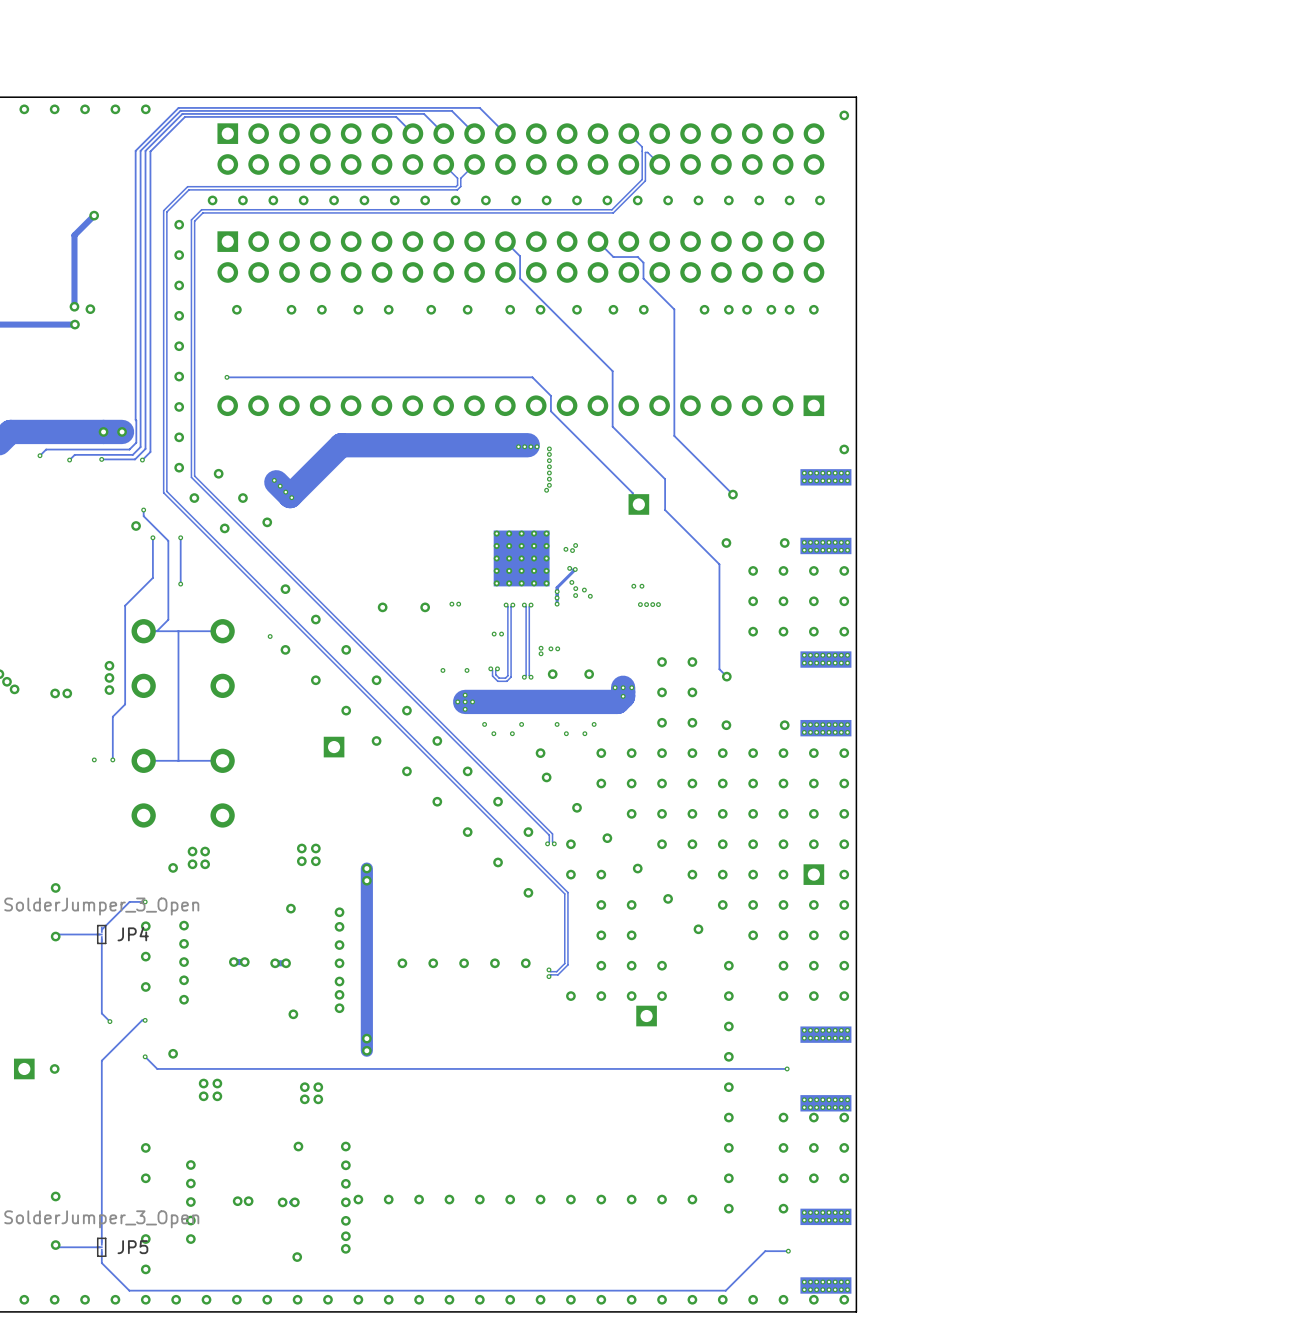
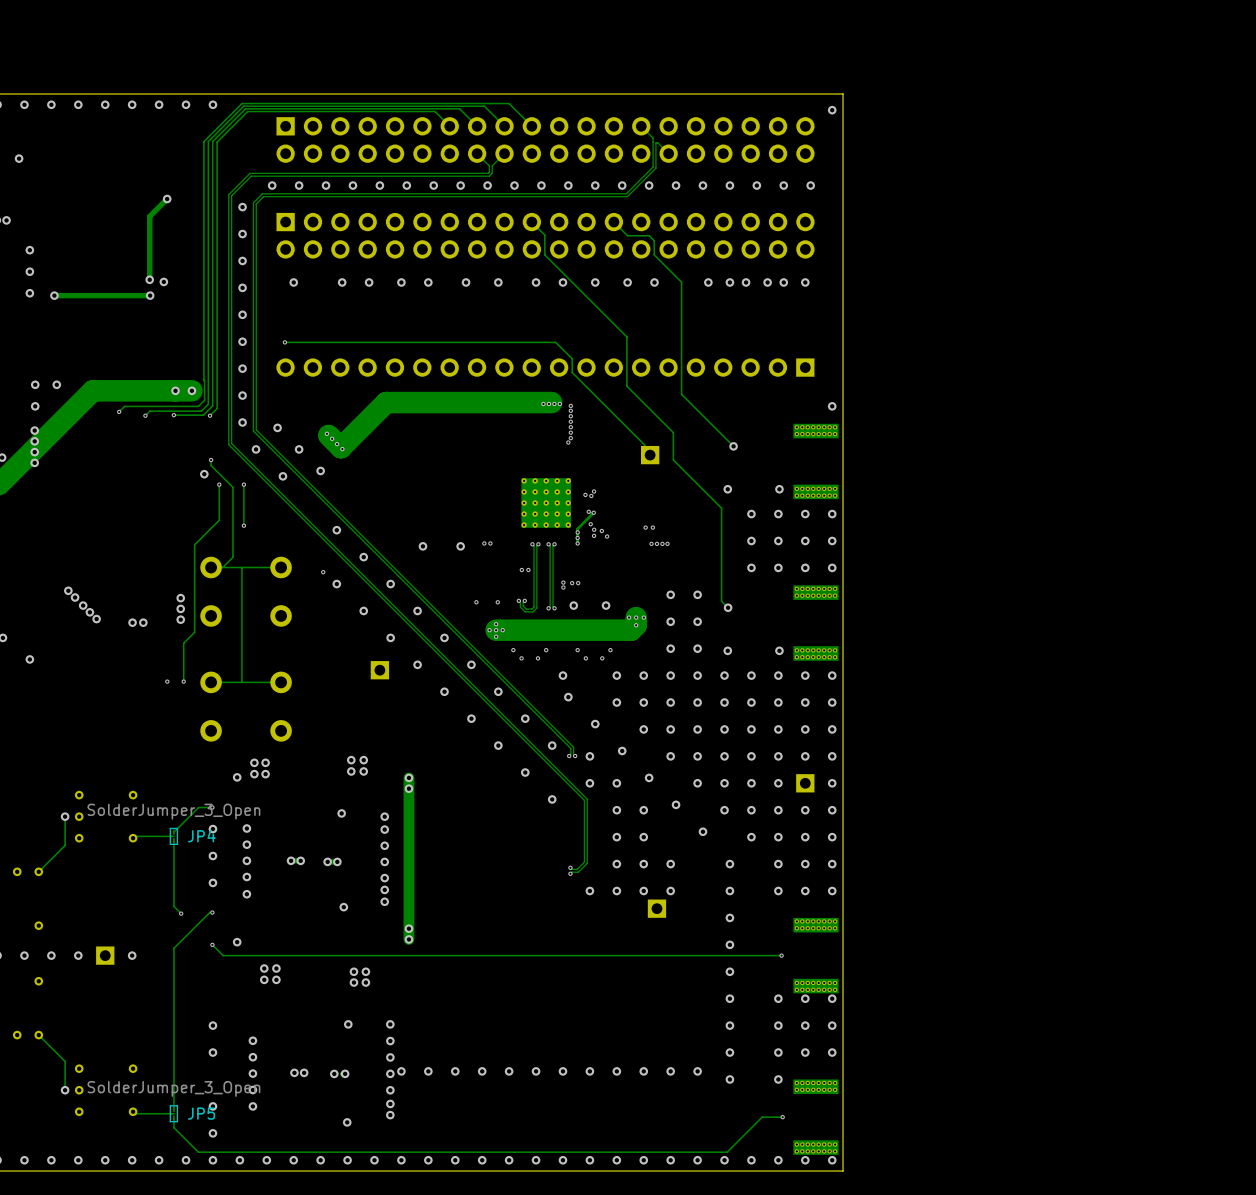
via: (402, 963) -> none
via: (433, 963) -> none
via: (464, 963) -> none
via: (494, 963) -> none
via: (525, 963) -> none

